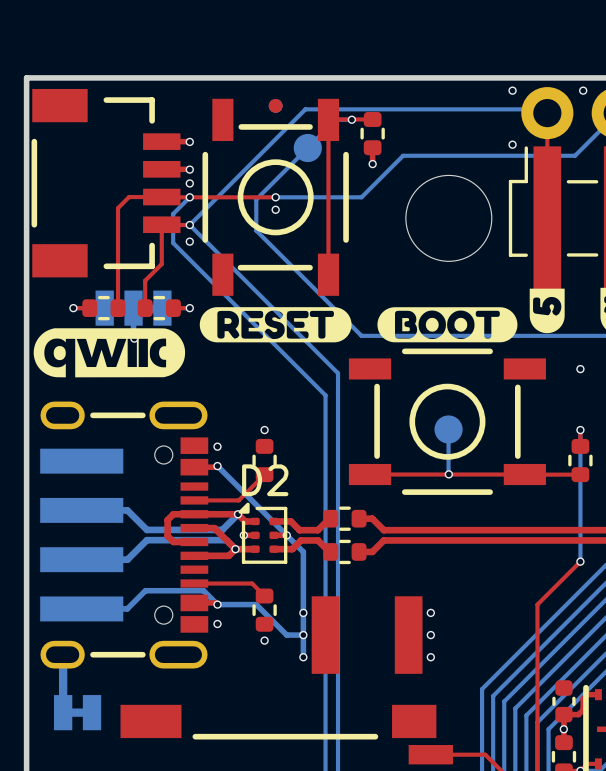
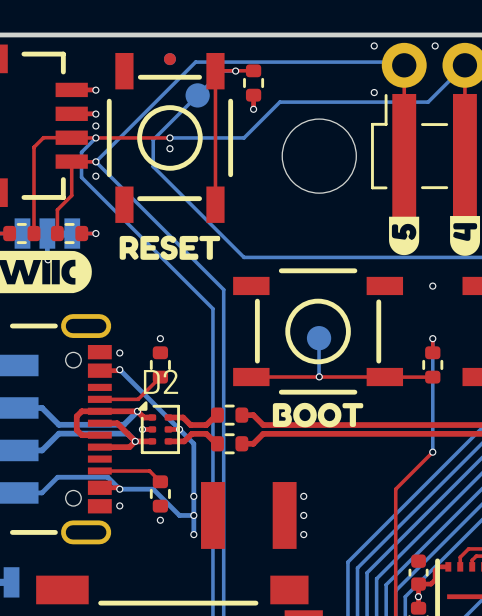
drawing shape: [199, 307, 352, 343] -> [119, 235, 221, 261]
drawing: [377, 307, 518, 343] -> none
drawing: none -> [272, 402, 364, 428]

